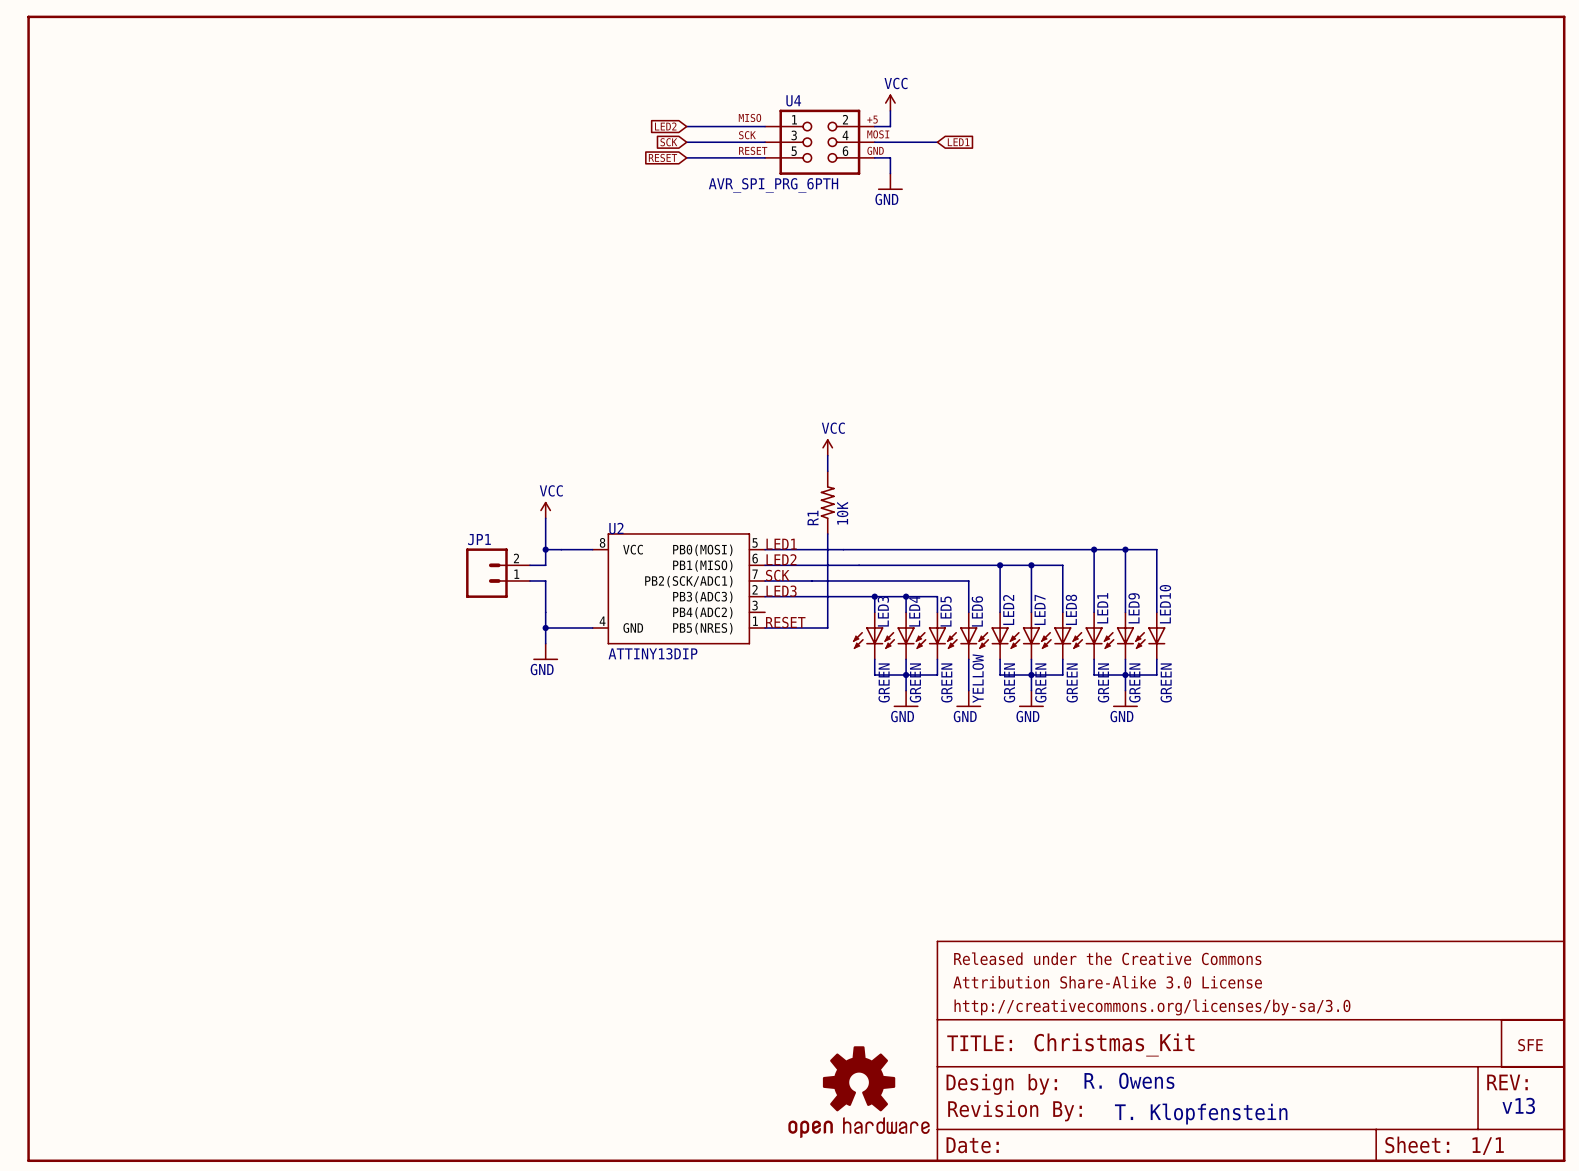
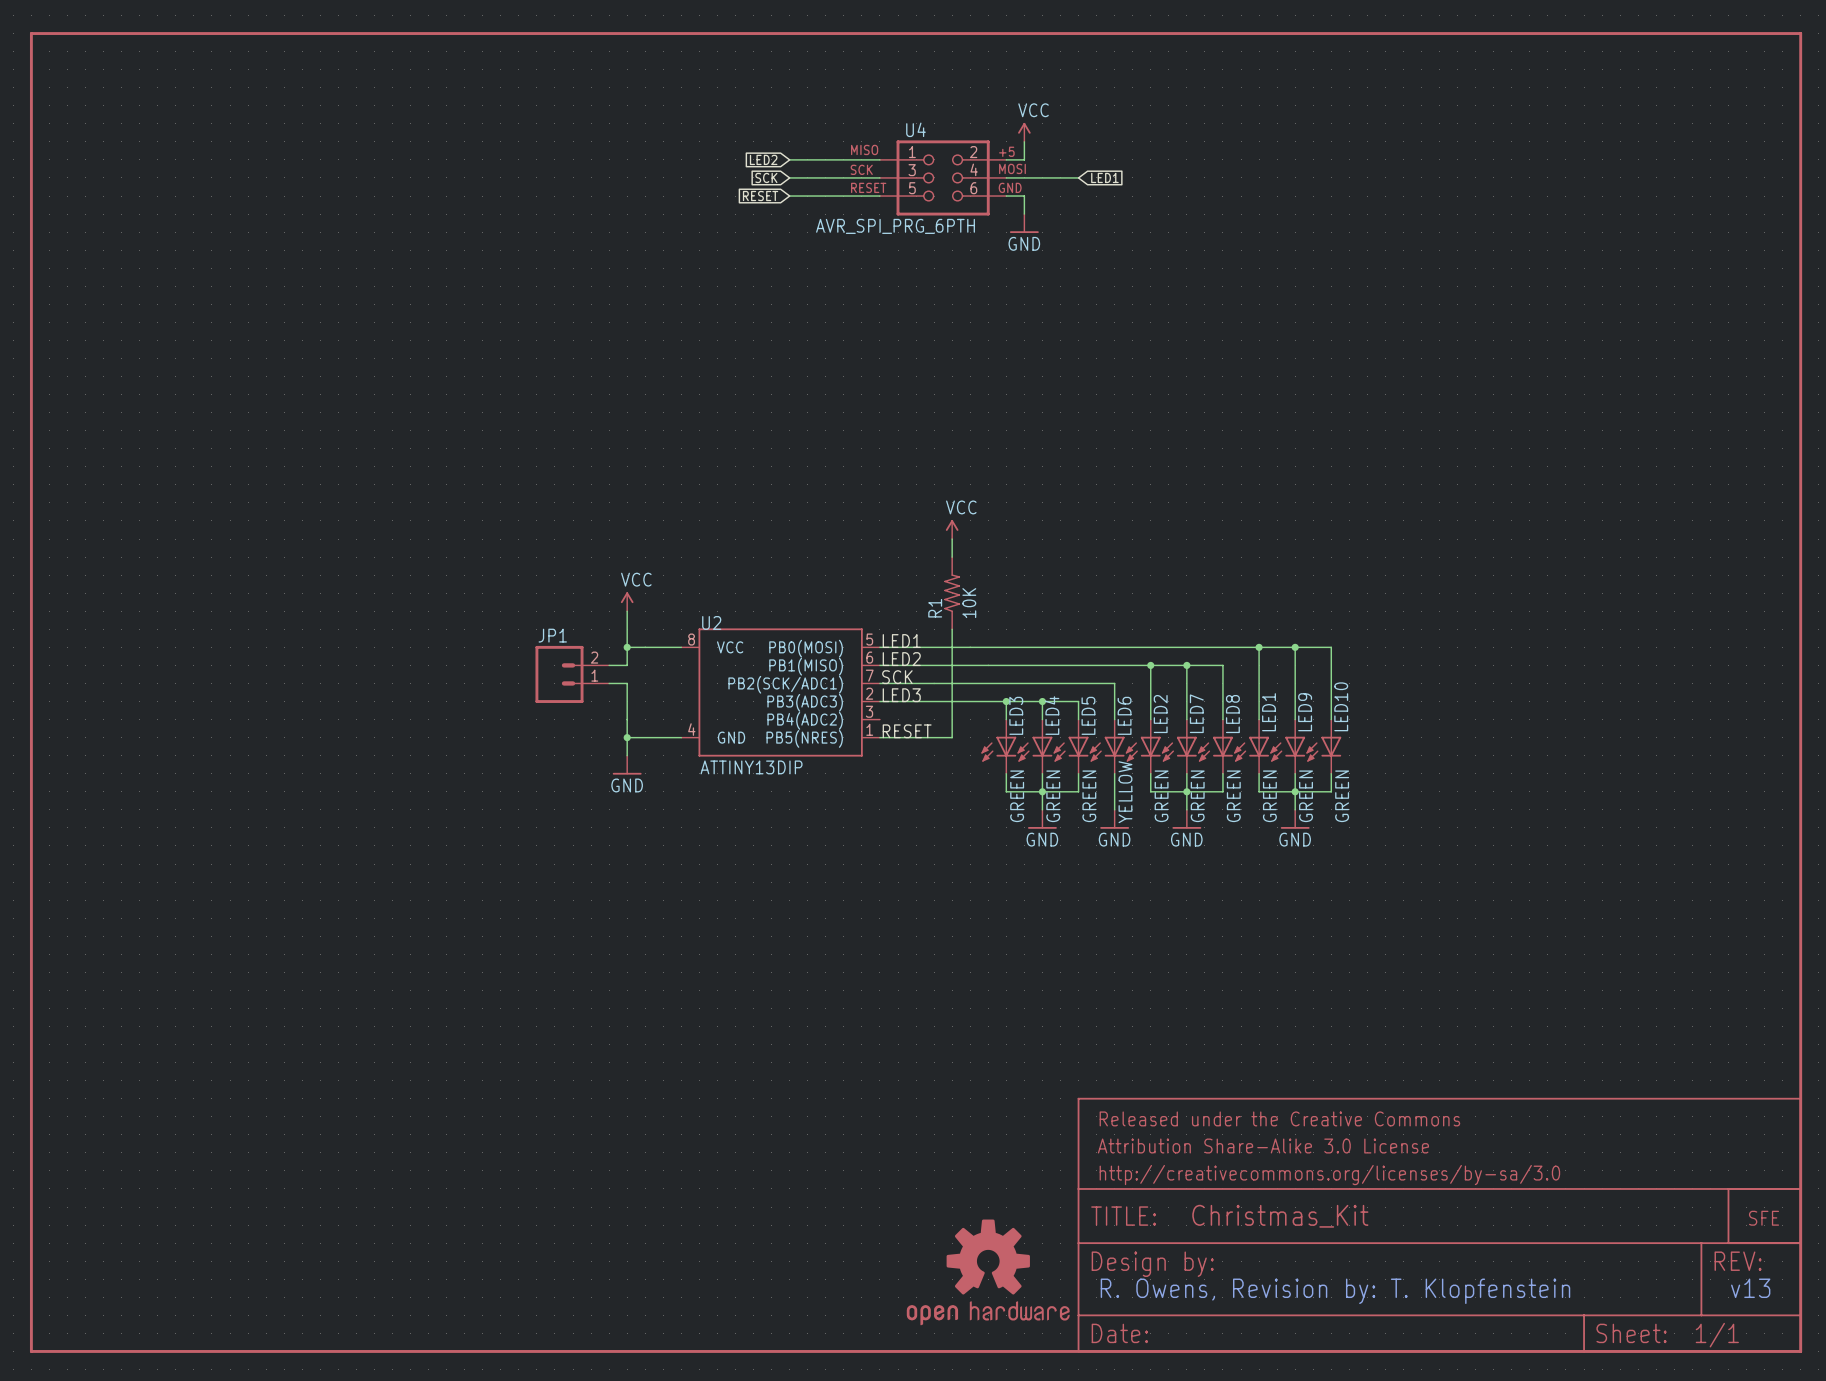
text: R. Owens (1129, 1080) -> none
text: none -> R. Owens, Revision by: T. Klopfenstein (1335, 1291)
part: (1015, 1110) -> none
text: T. Klopfenstein (1201, 1114) -> none

